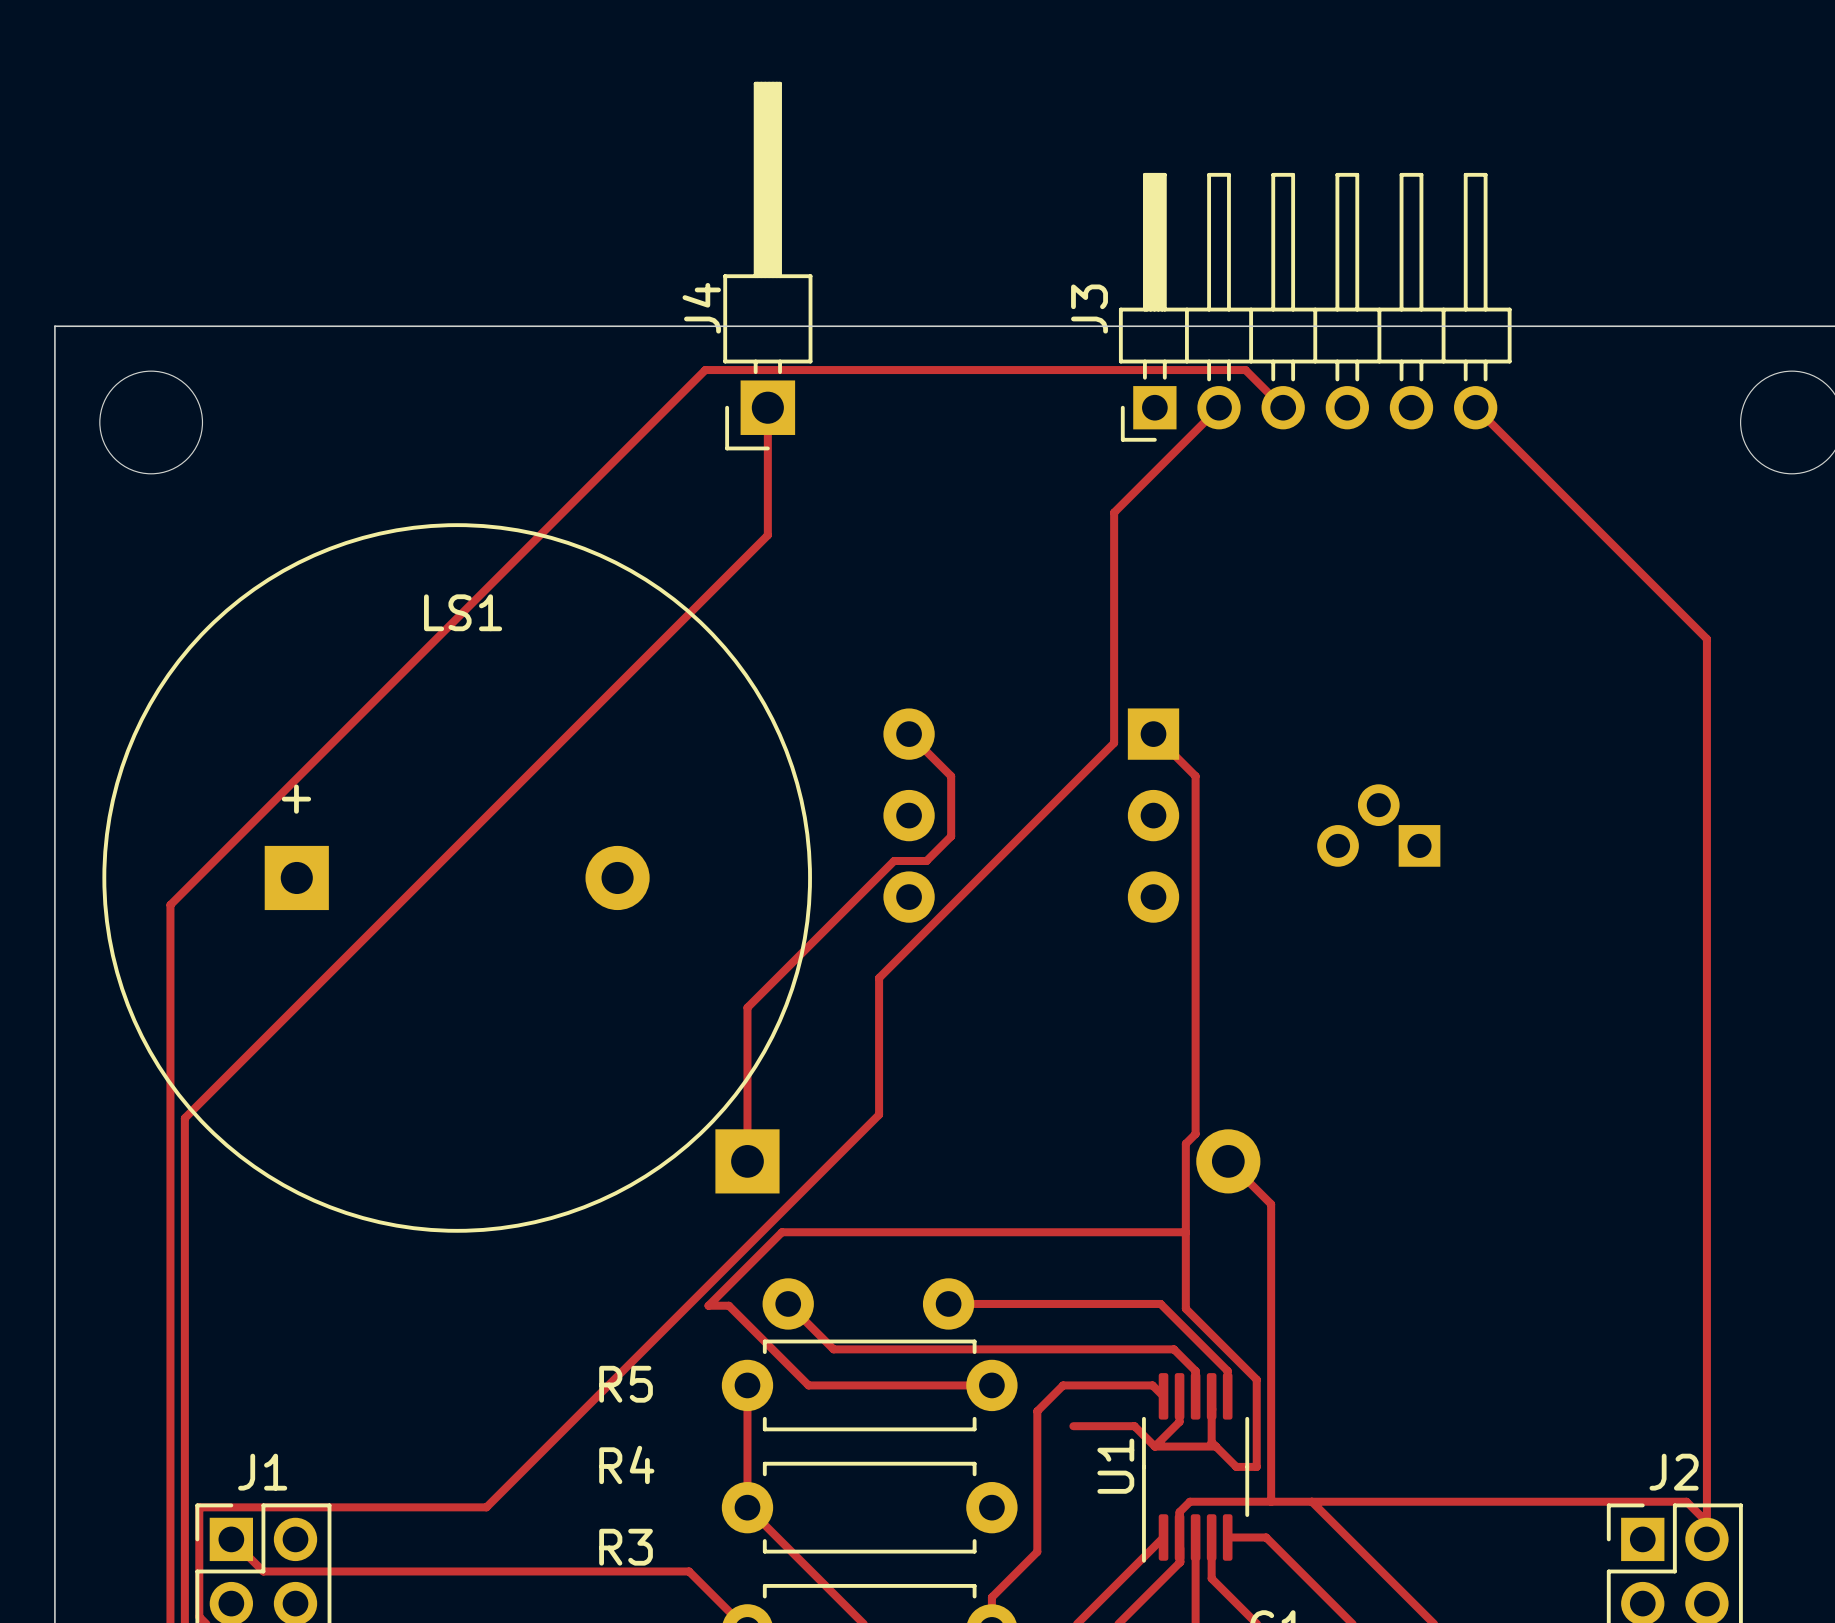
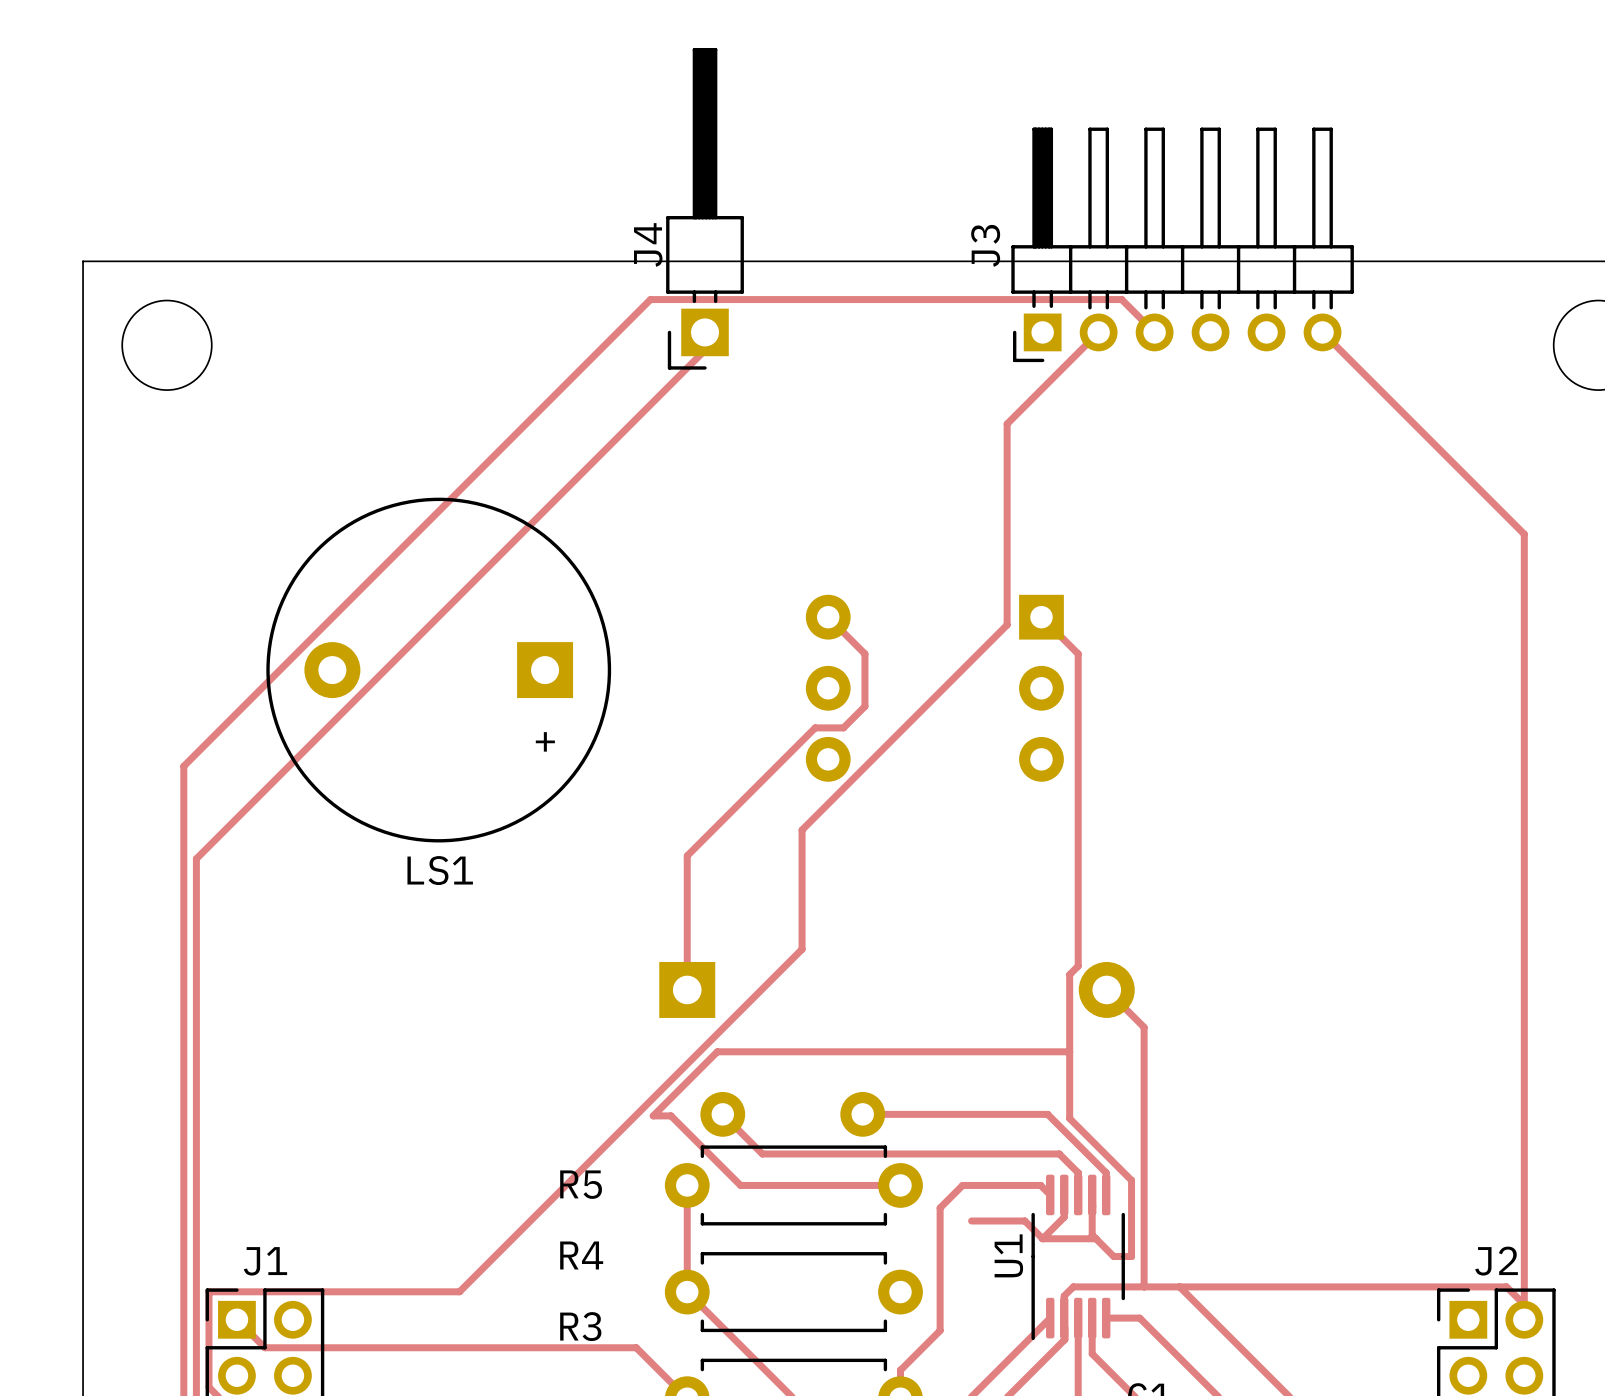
track: (767, 428) (767, 535) (184, 1118) -> (705, 350) (196, 858) (196, 952)
LS1 footprint: [102, 523, 812, 1233] -> [266, 497, 612, 843]
LS1 name position: LS1 (463, 612) -> LS1 (440, 870)
part: (1378, 825) -> none

